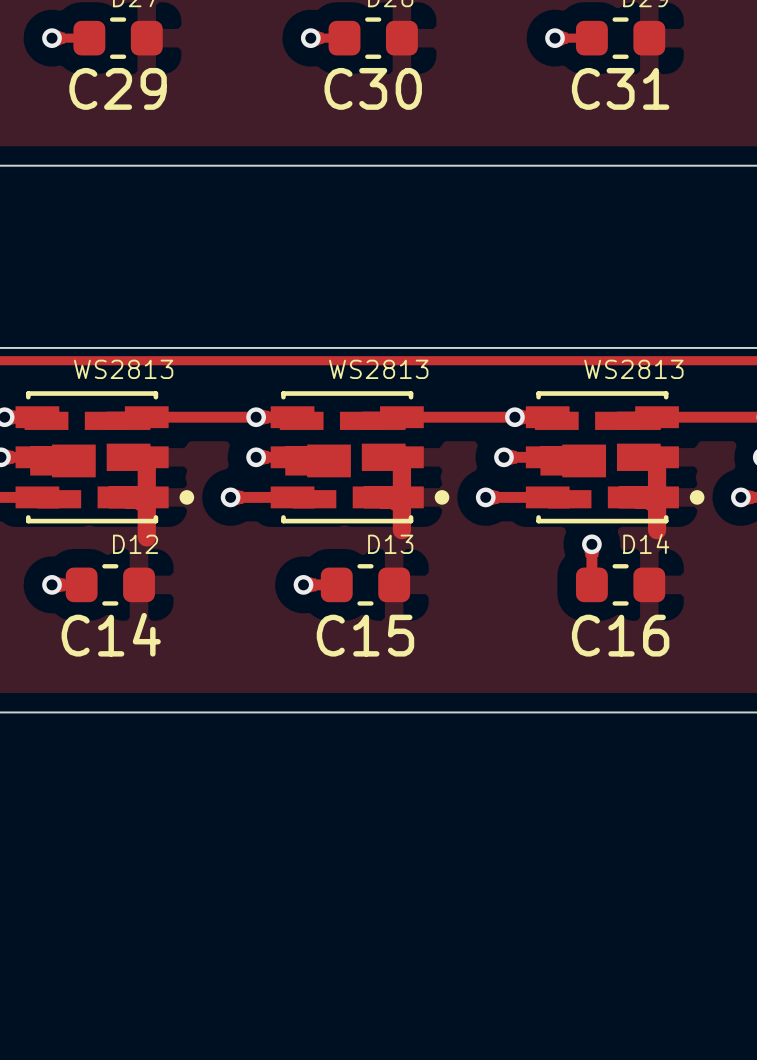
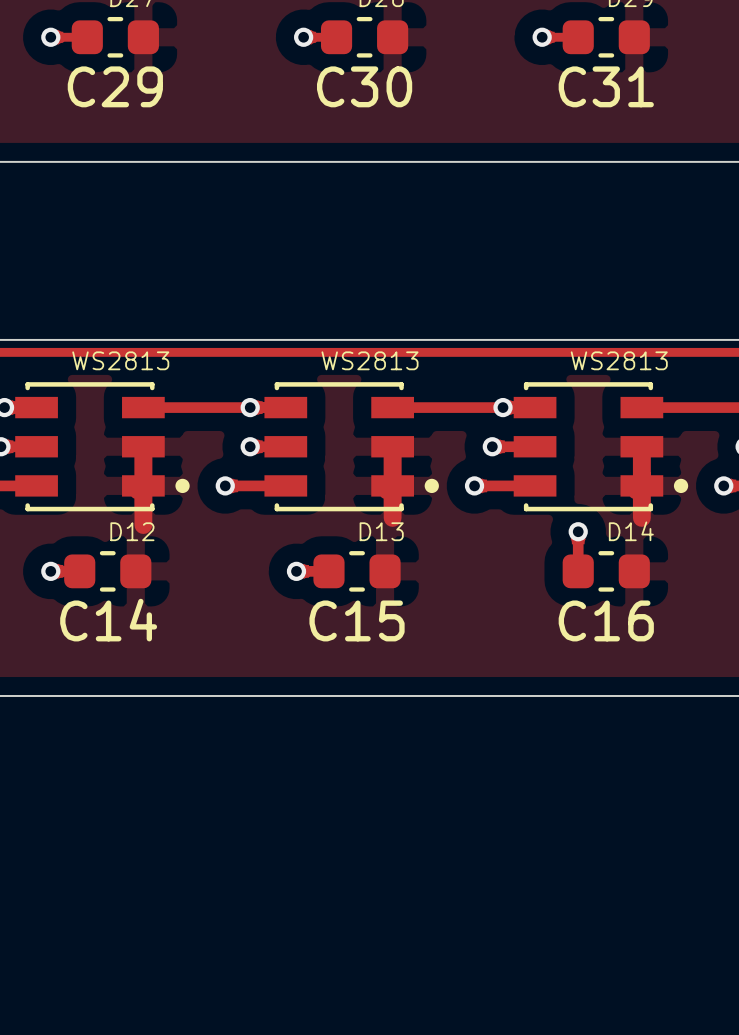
D12 footprint: [15, 391, 195, 524] -> [15, 382, 190, 512]
D13 footprint: [270, 391, 450, 524] -> [264, 382, 439, 512]
D14 footprint: [525, 391, 705, 524] -> [513, 382, 689, 512]

